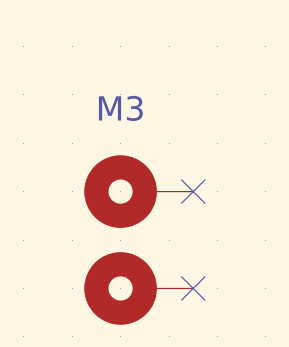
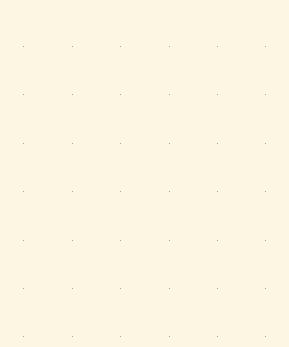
text: M3 (120, 108) -> none
part: (138, 191) -> none
no-connect mark: (193, 191) -> none
part: (138, 288) -> none
no-connect mark: (193, 288) -> none

